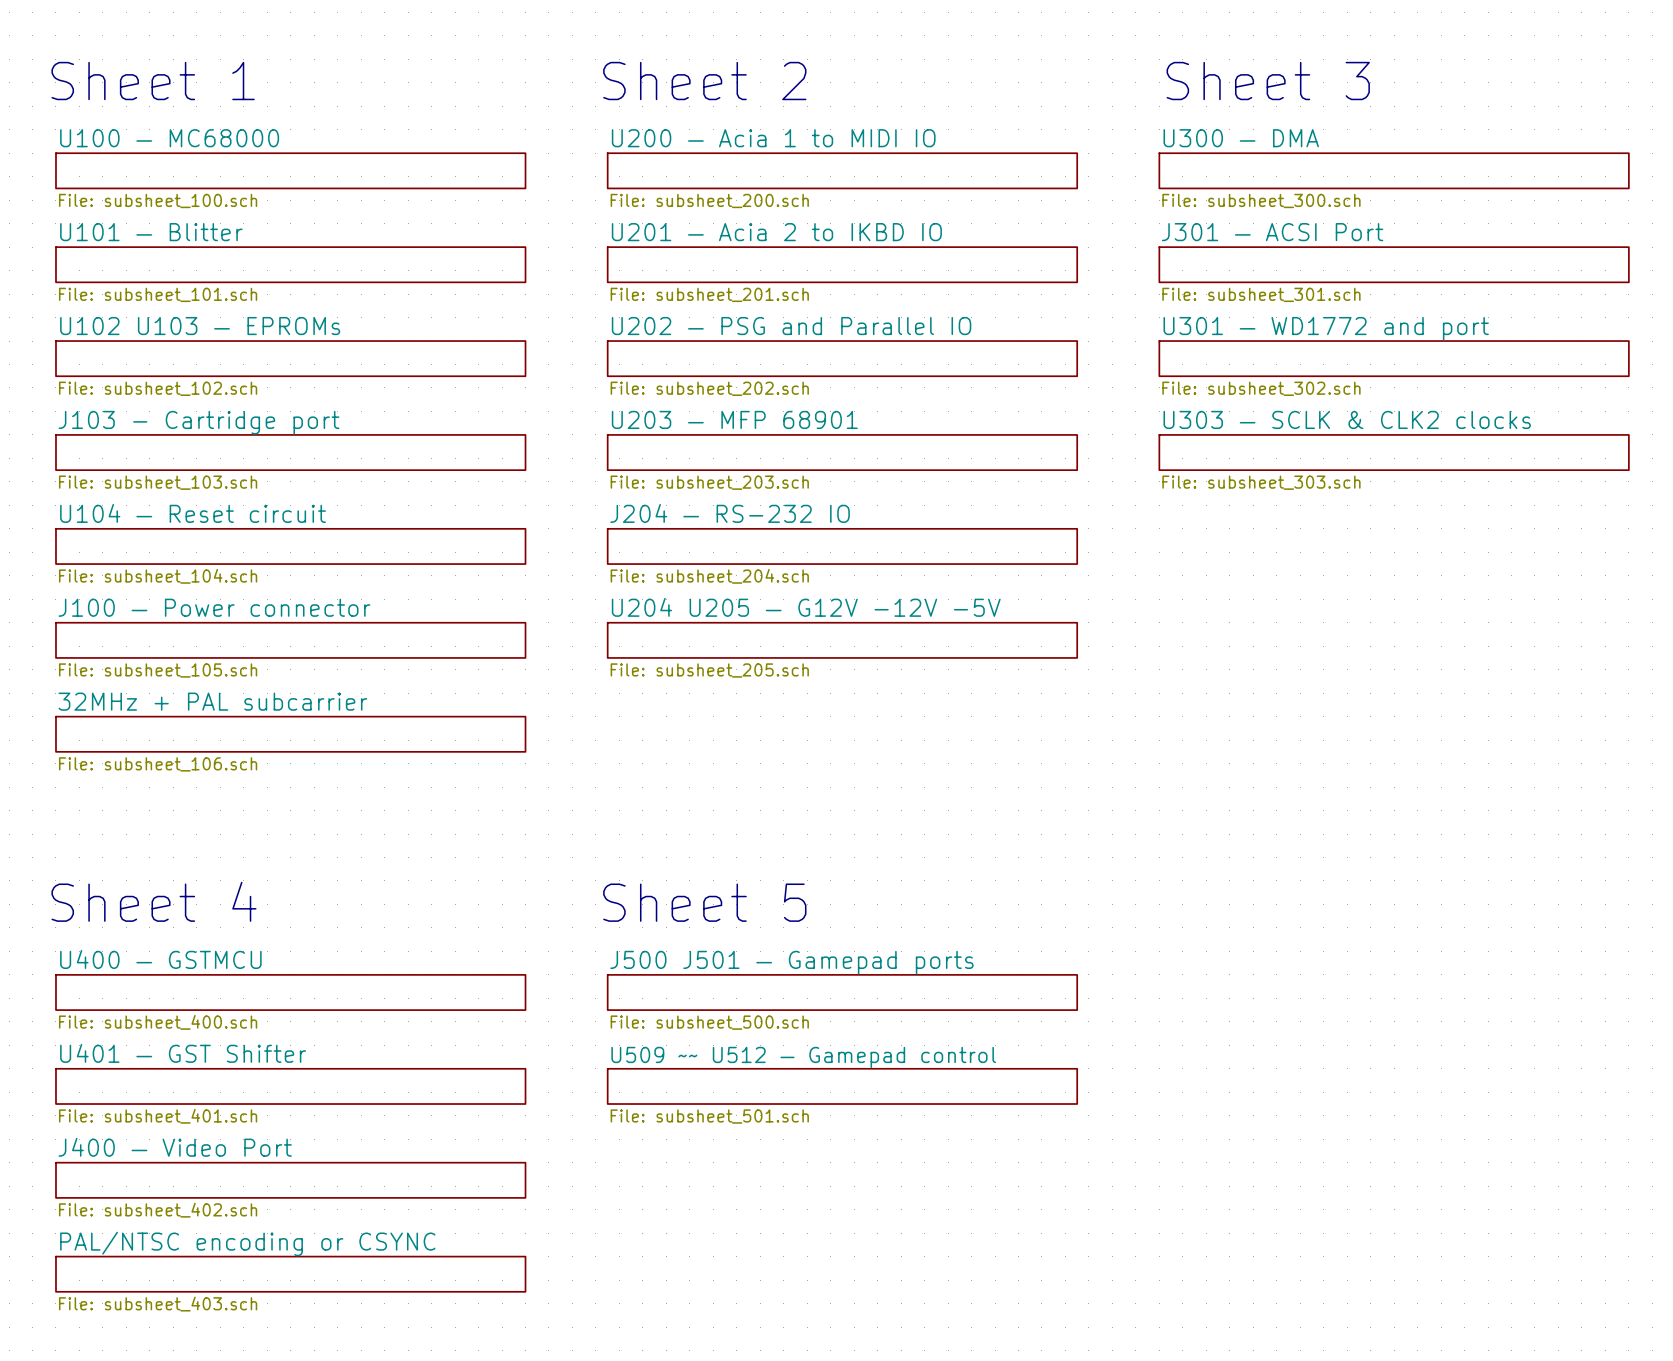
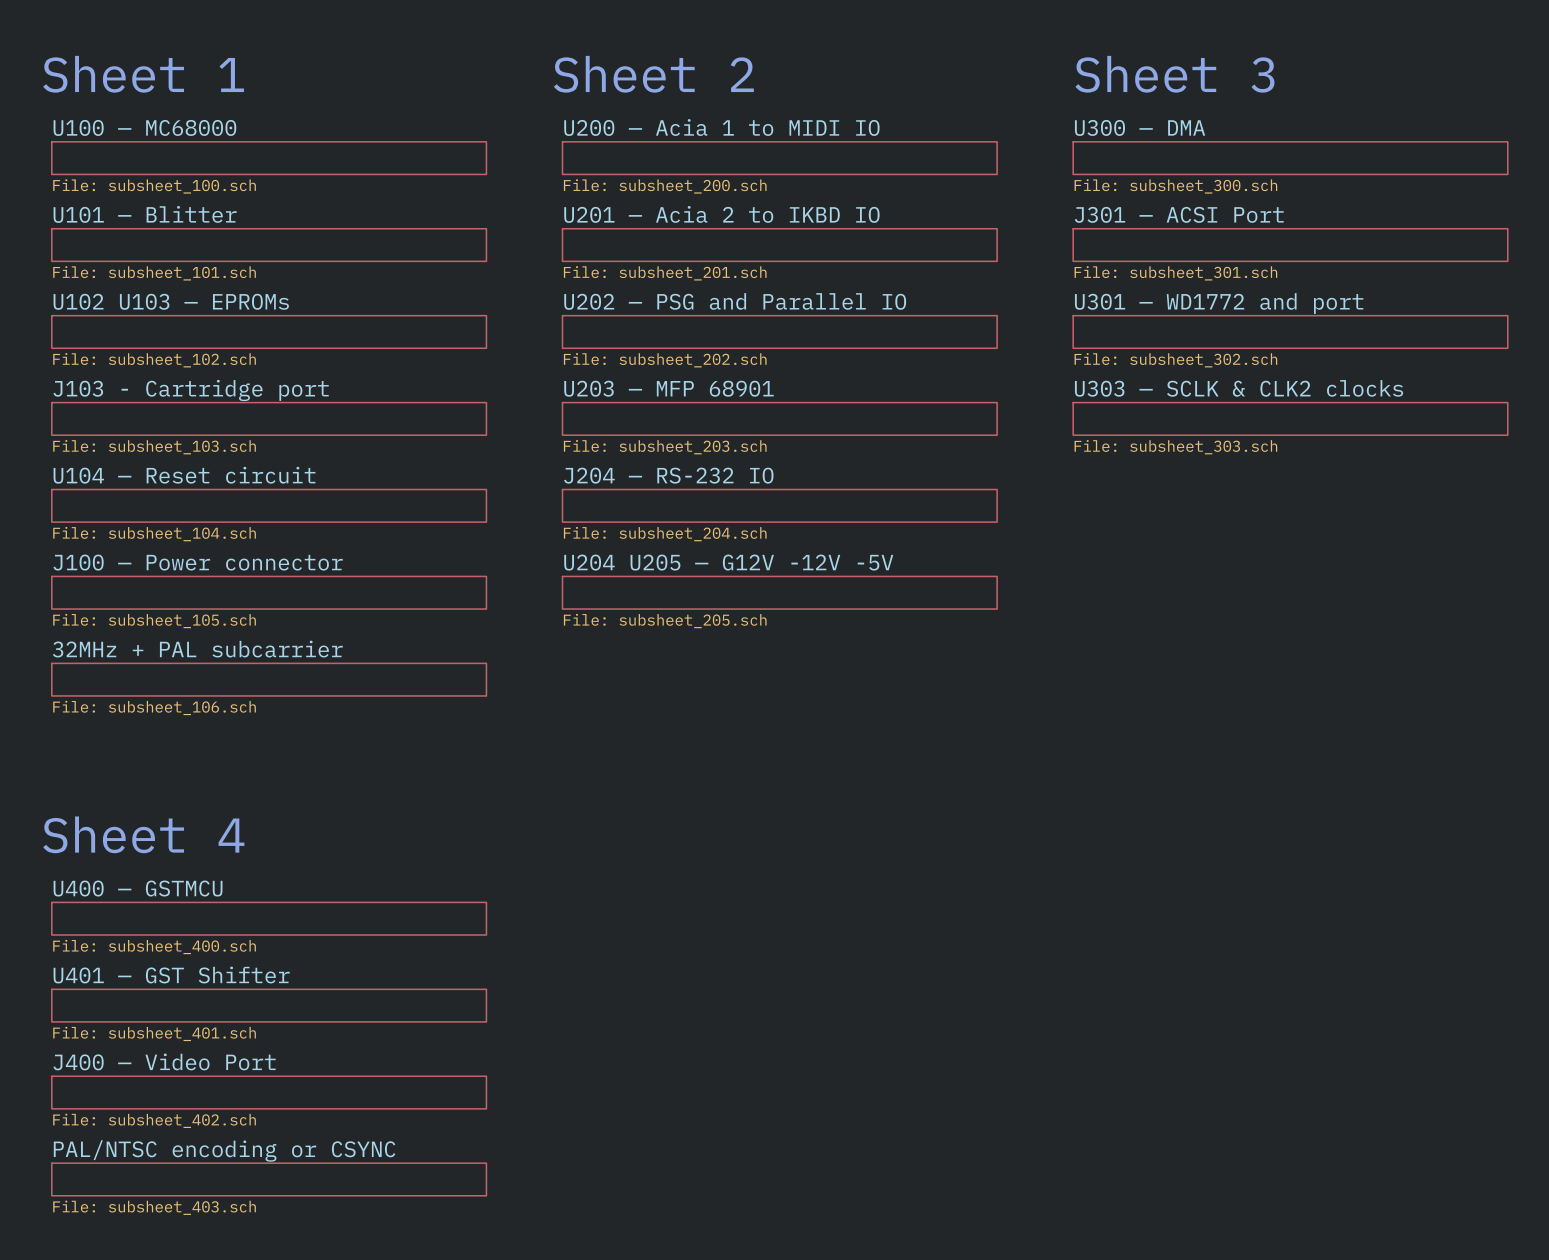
text: Sheet 5 (704, 902) -> none
sheet J500 J501 — Gamepad ports: File: subsheet_500.sch (842, 992) -> none
sheet U509 ~~ U512 — Gamepad control: File: subsheet_501.sch (842, 1086) -> none

